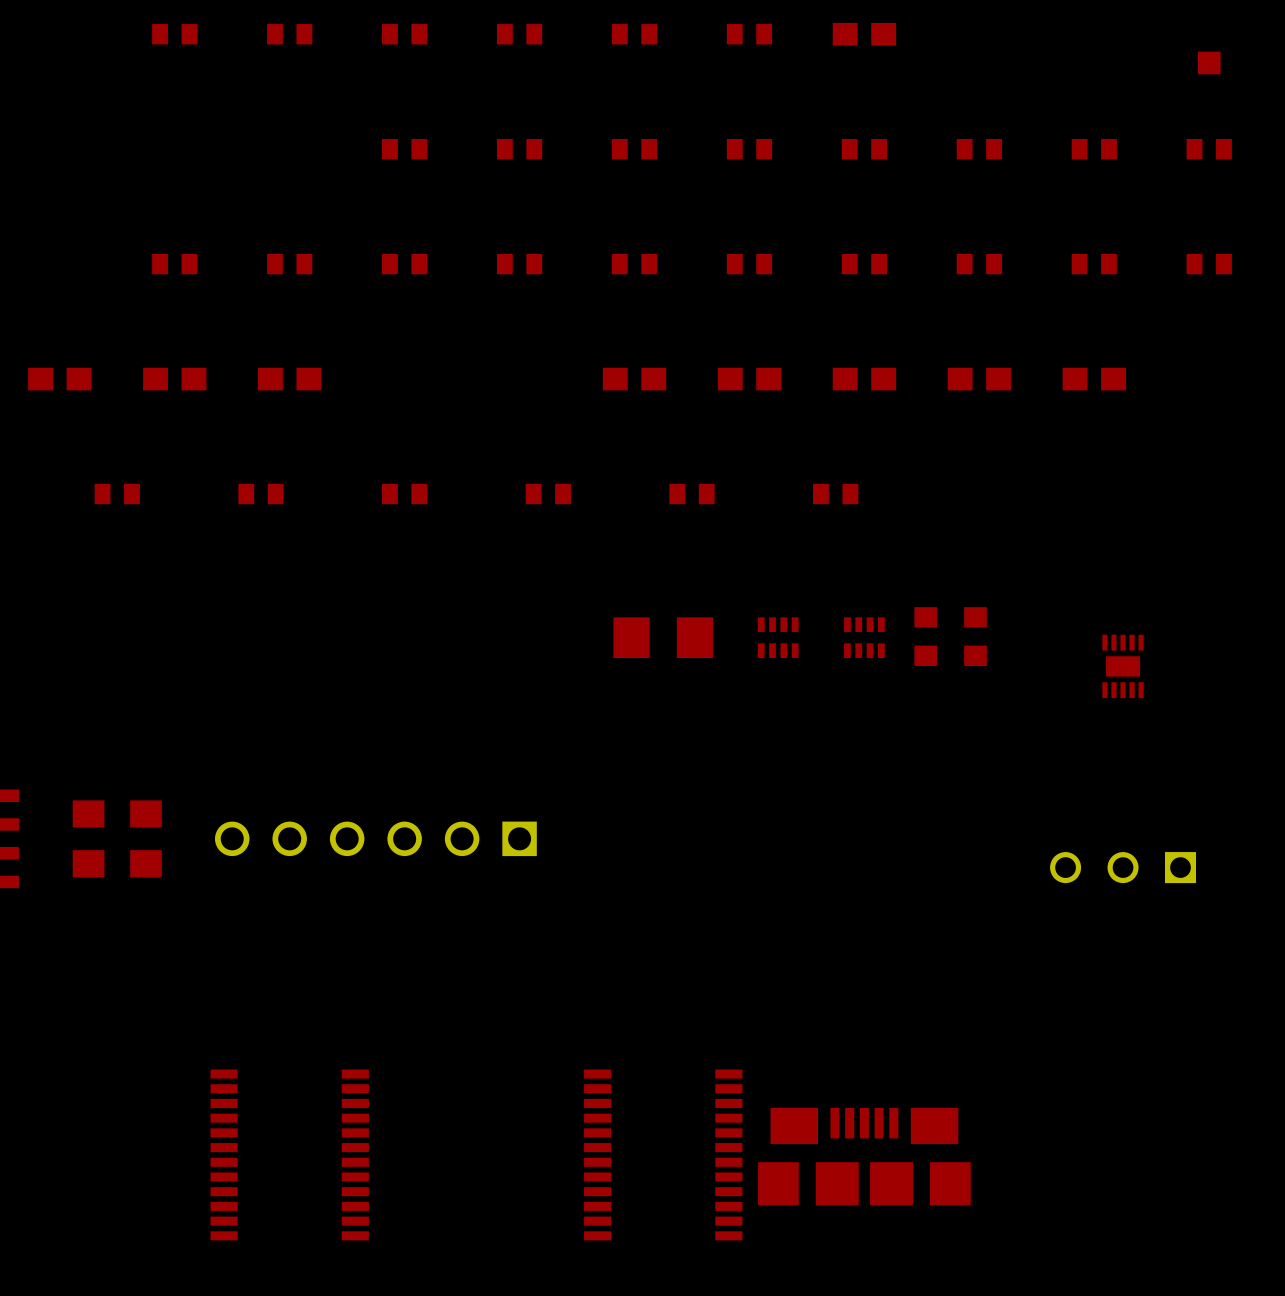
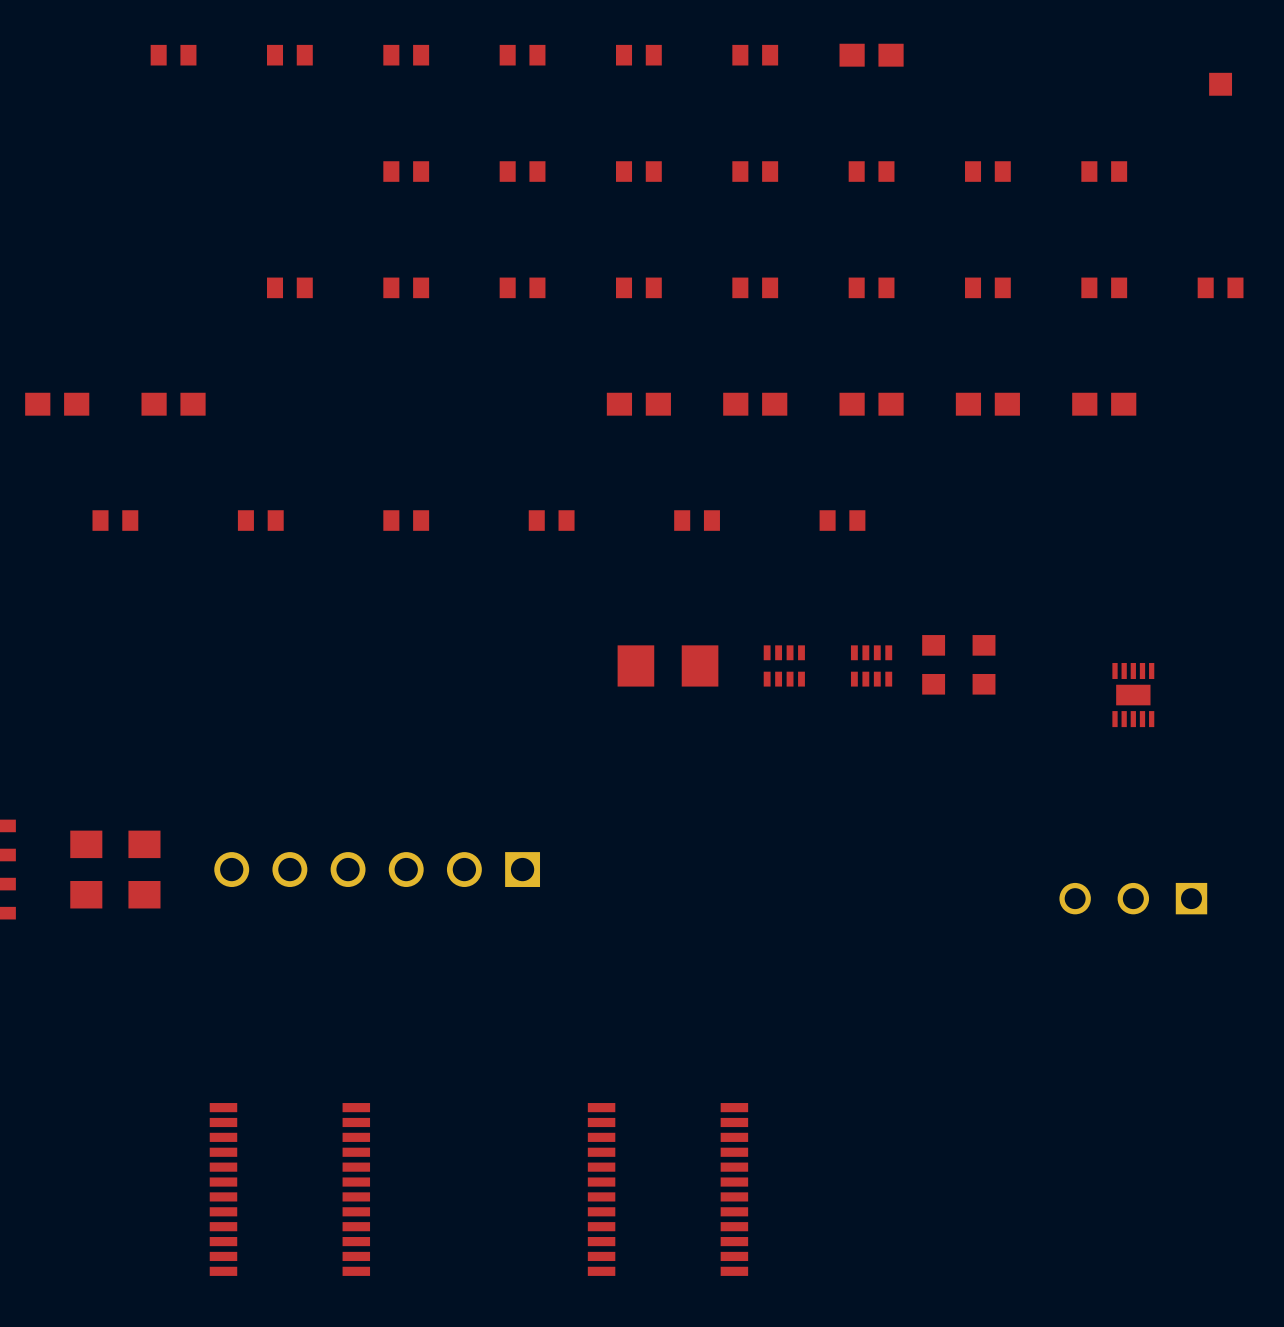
part: (1209, 149) -> none
part: (174, 264) -> none
part: (289, 379) -> none
part: (864, 1156) -> none

